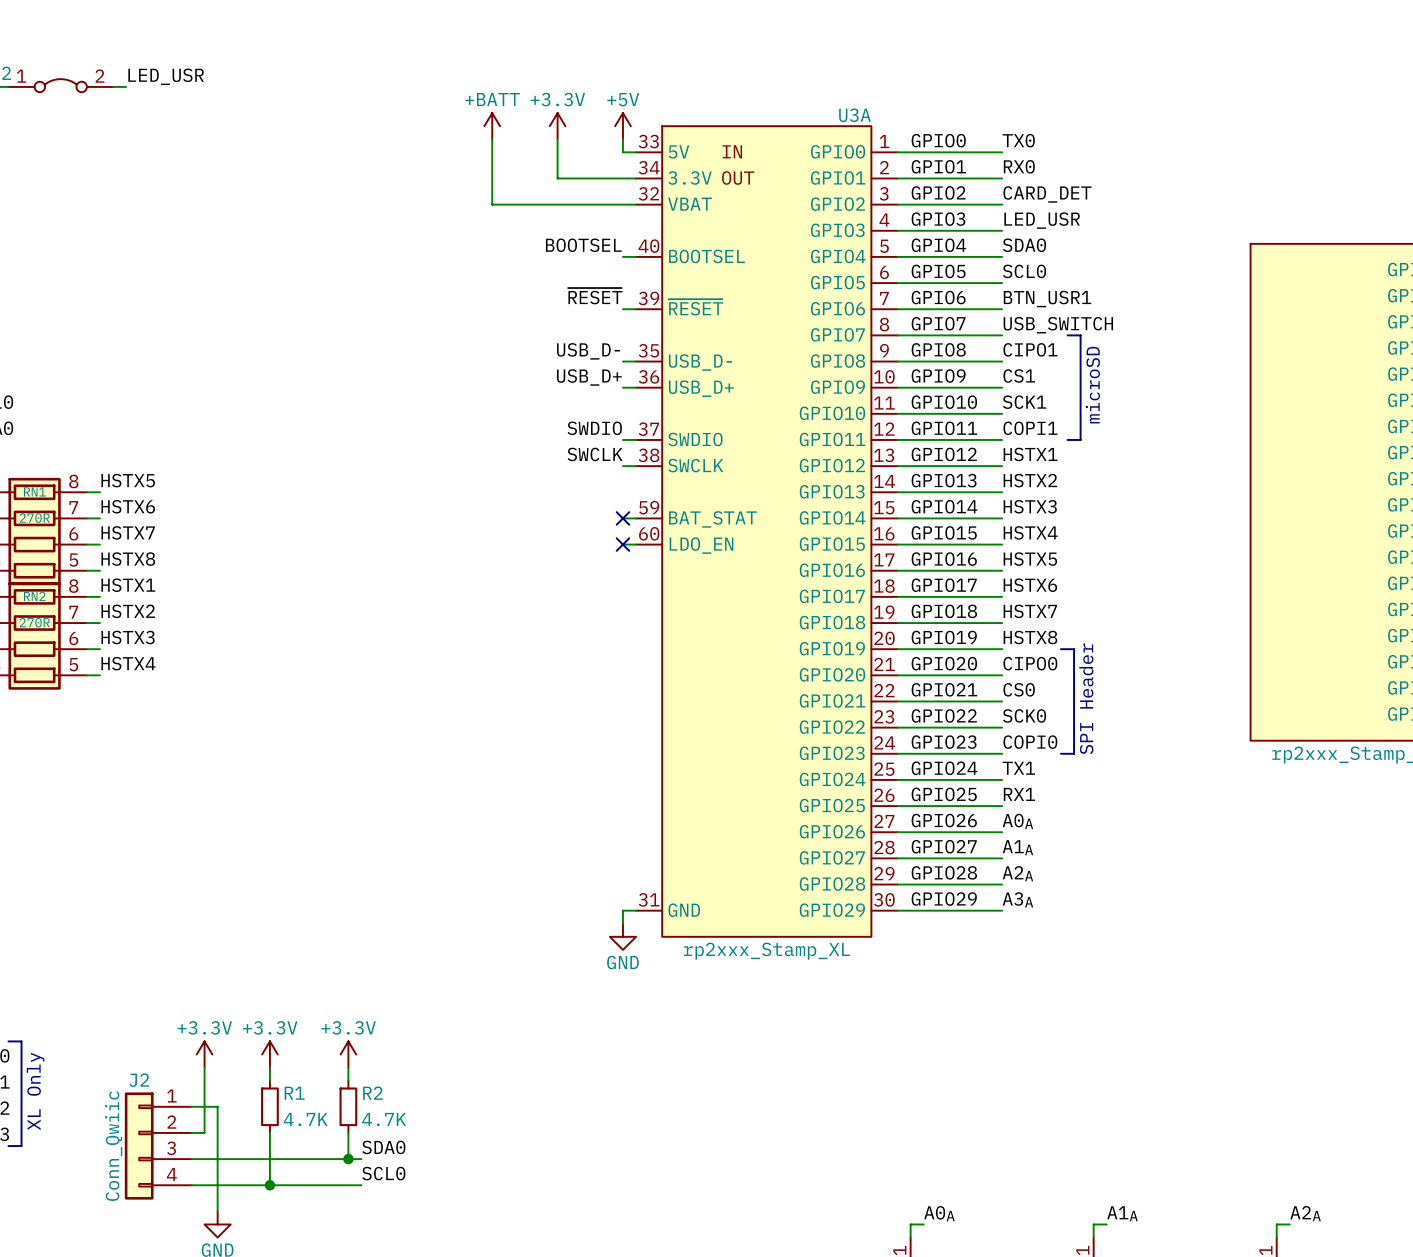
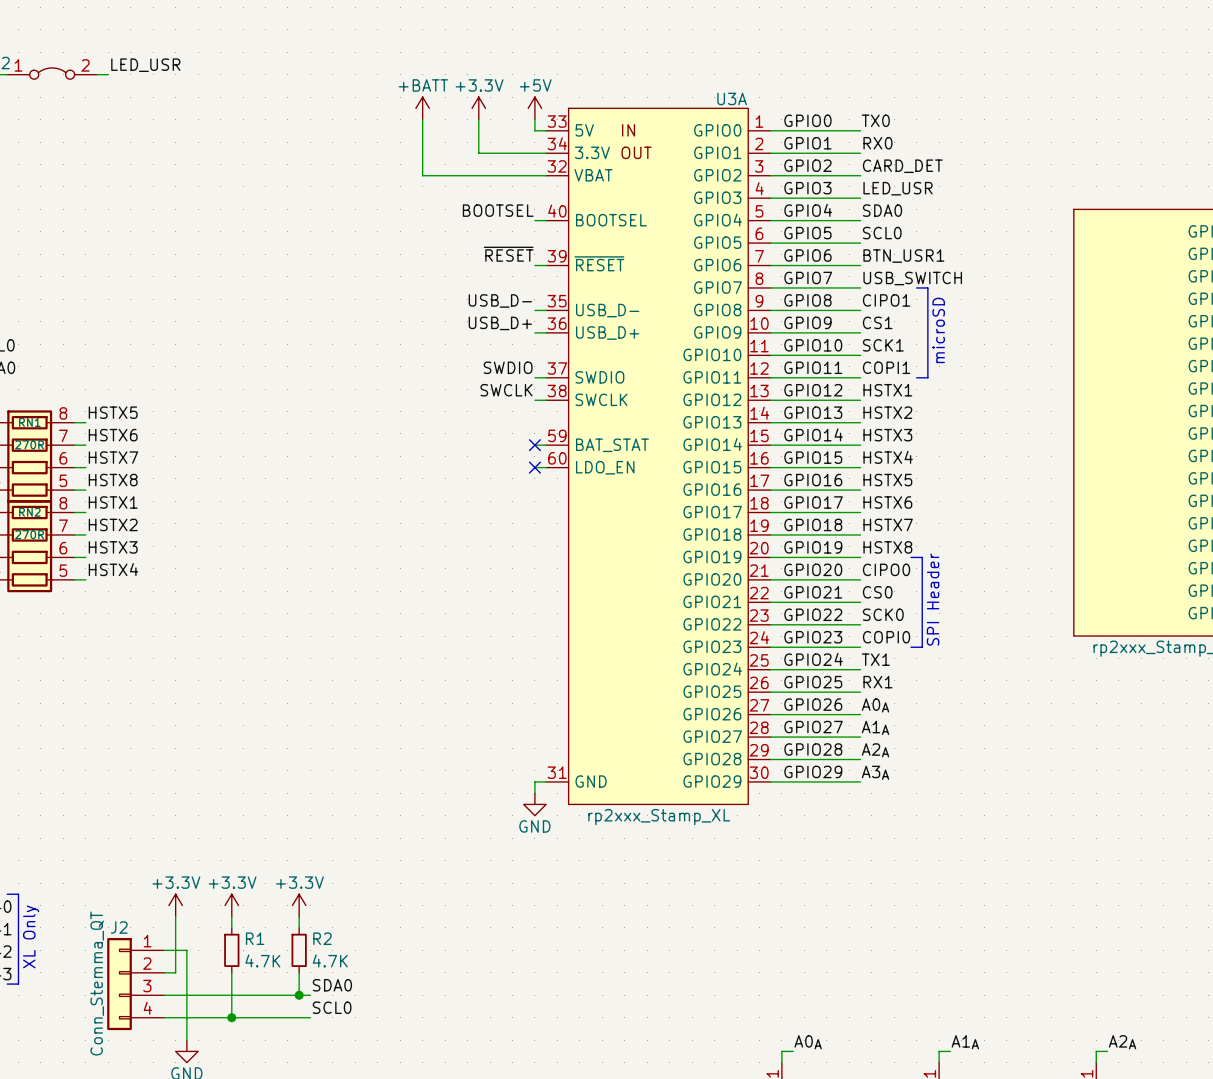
J2 value: Conn_Qwiic (113, 1146) -> Conn_Stemma_QT (97, 983)

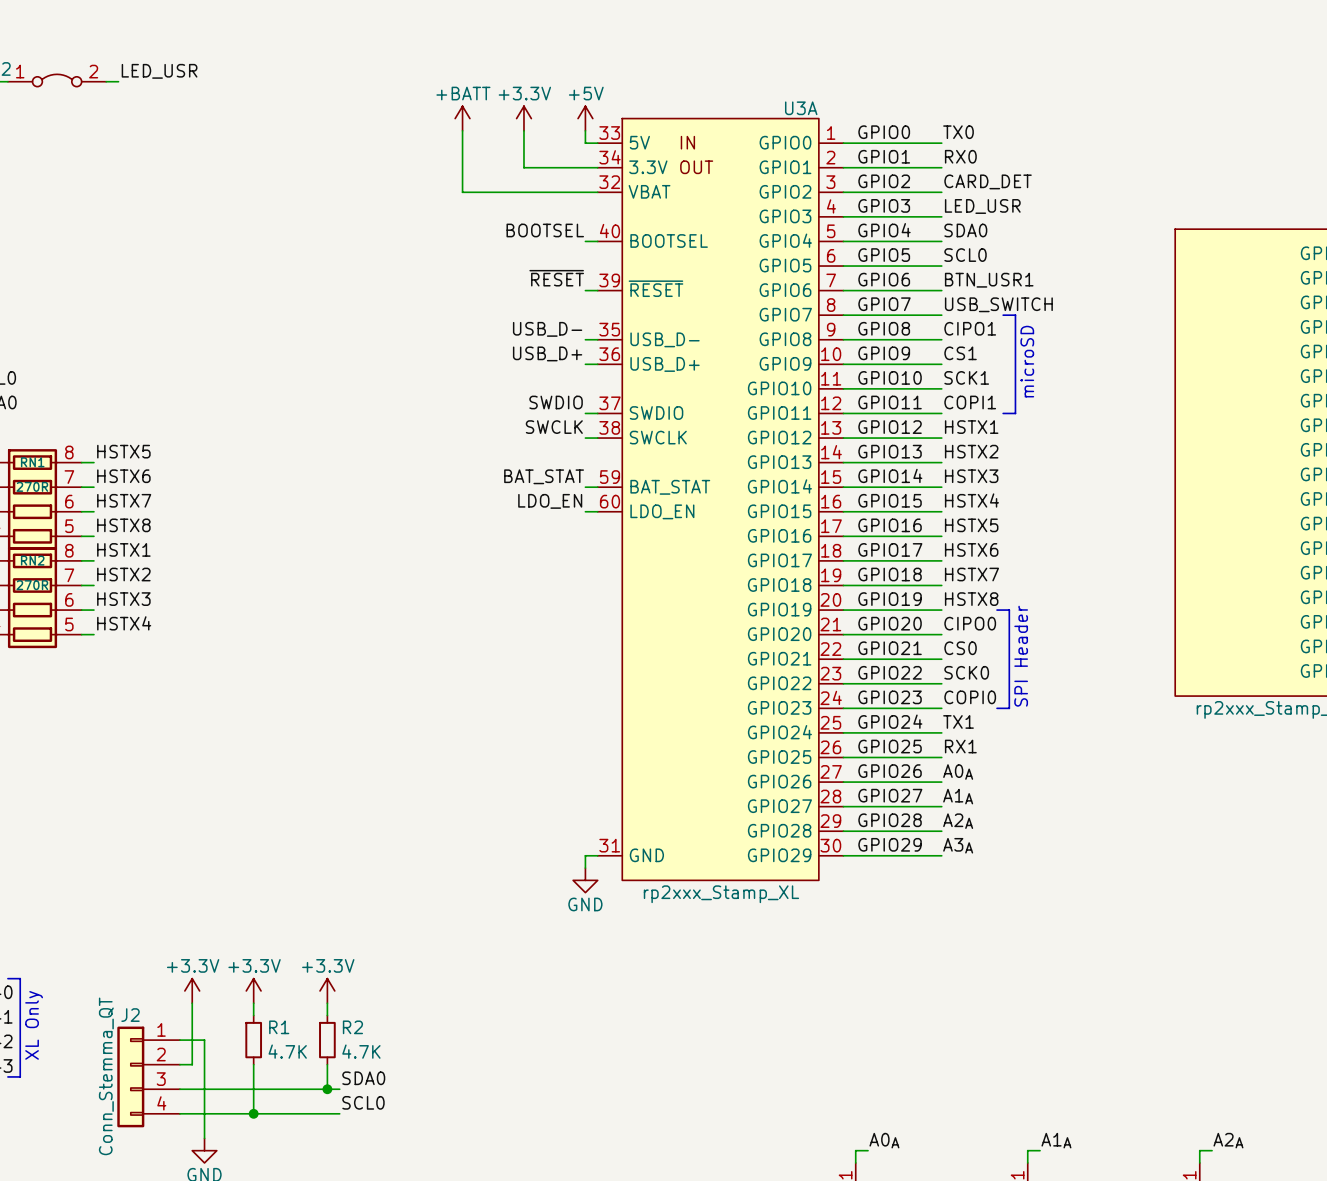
label: none -> BAT_STAT (544, 476)
no-connect mark: (534, 445) -> none
label: none -> LDO_EN (550, 501)
no-connect mark: (534, 467) -> none

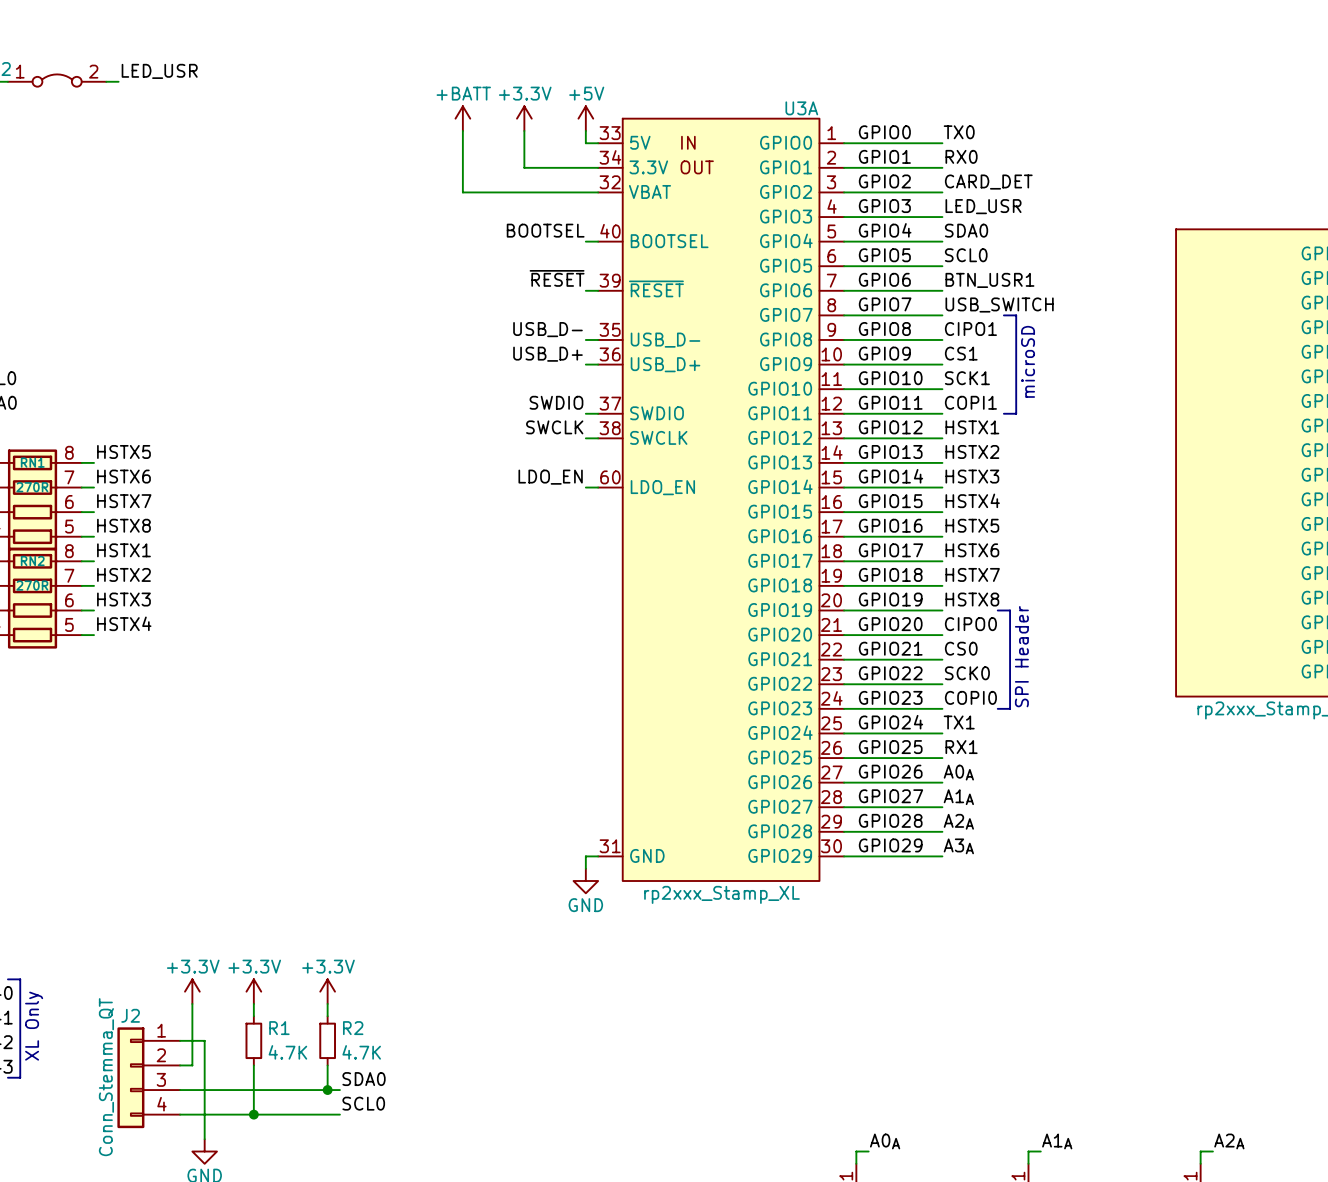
U3A symbol: [597, 117, 844, 882] -> [598, 117, 845, 882]
label: BAT_STAT (544, 476) -> LDO_EN (550, 477)
label: LDO_EN (550, 501) -> none
wire: (585, 511) (597, 511) -> none

